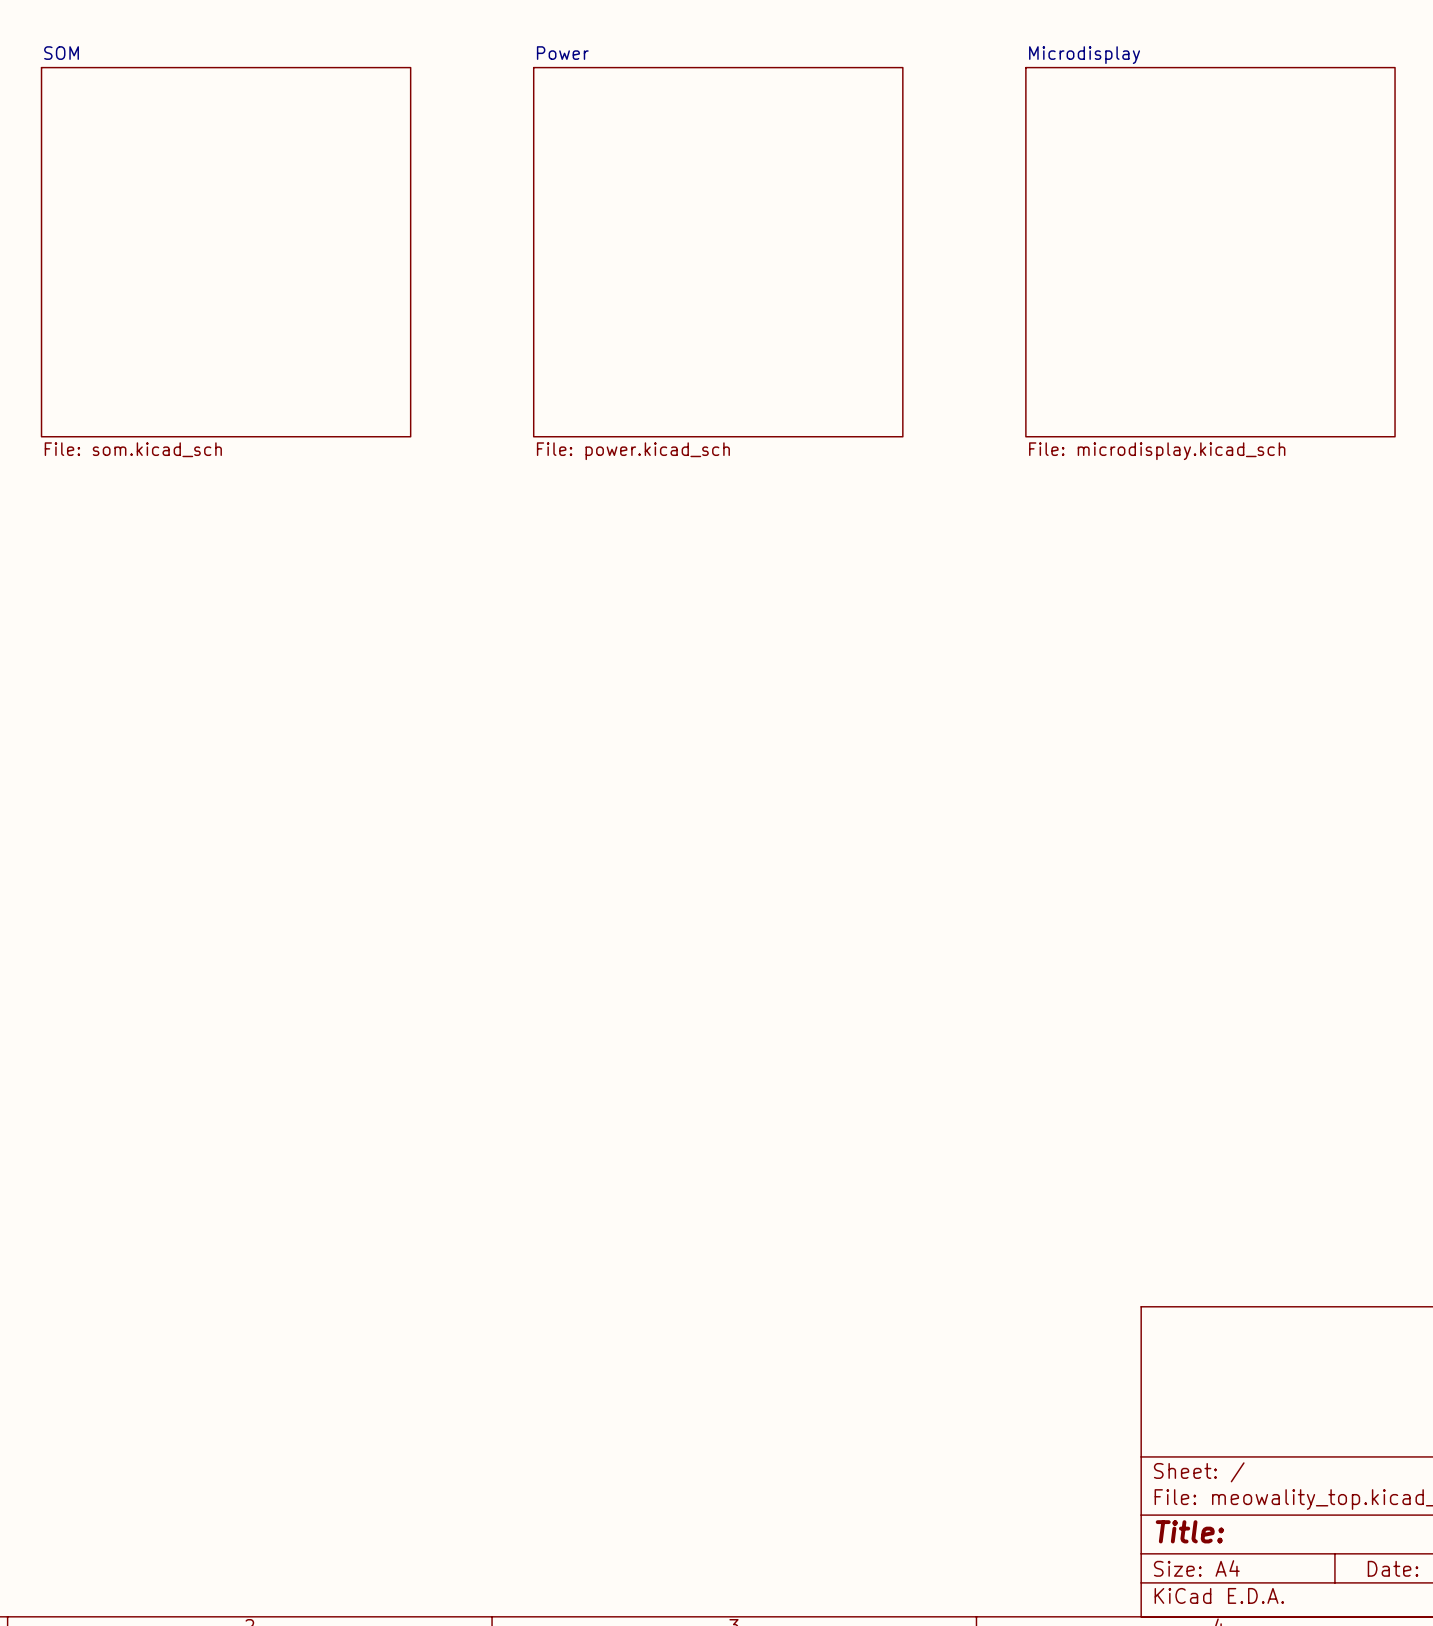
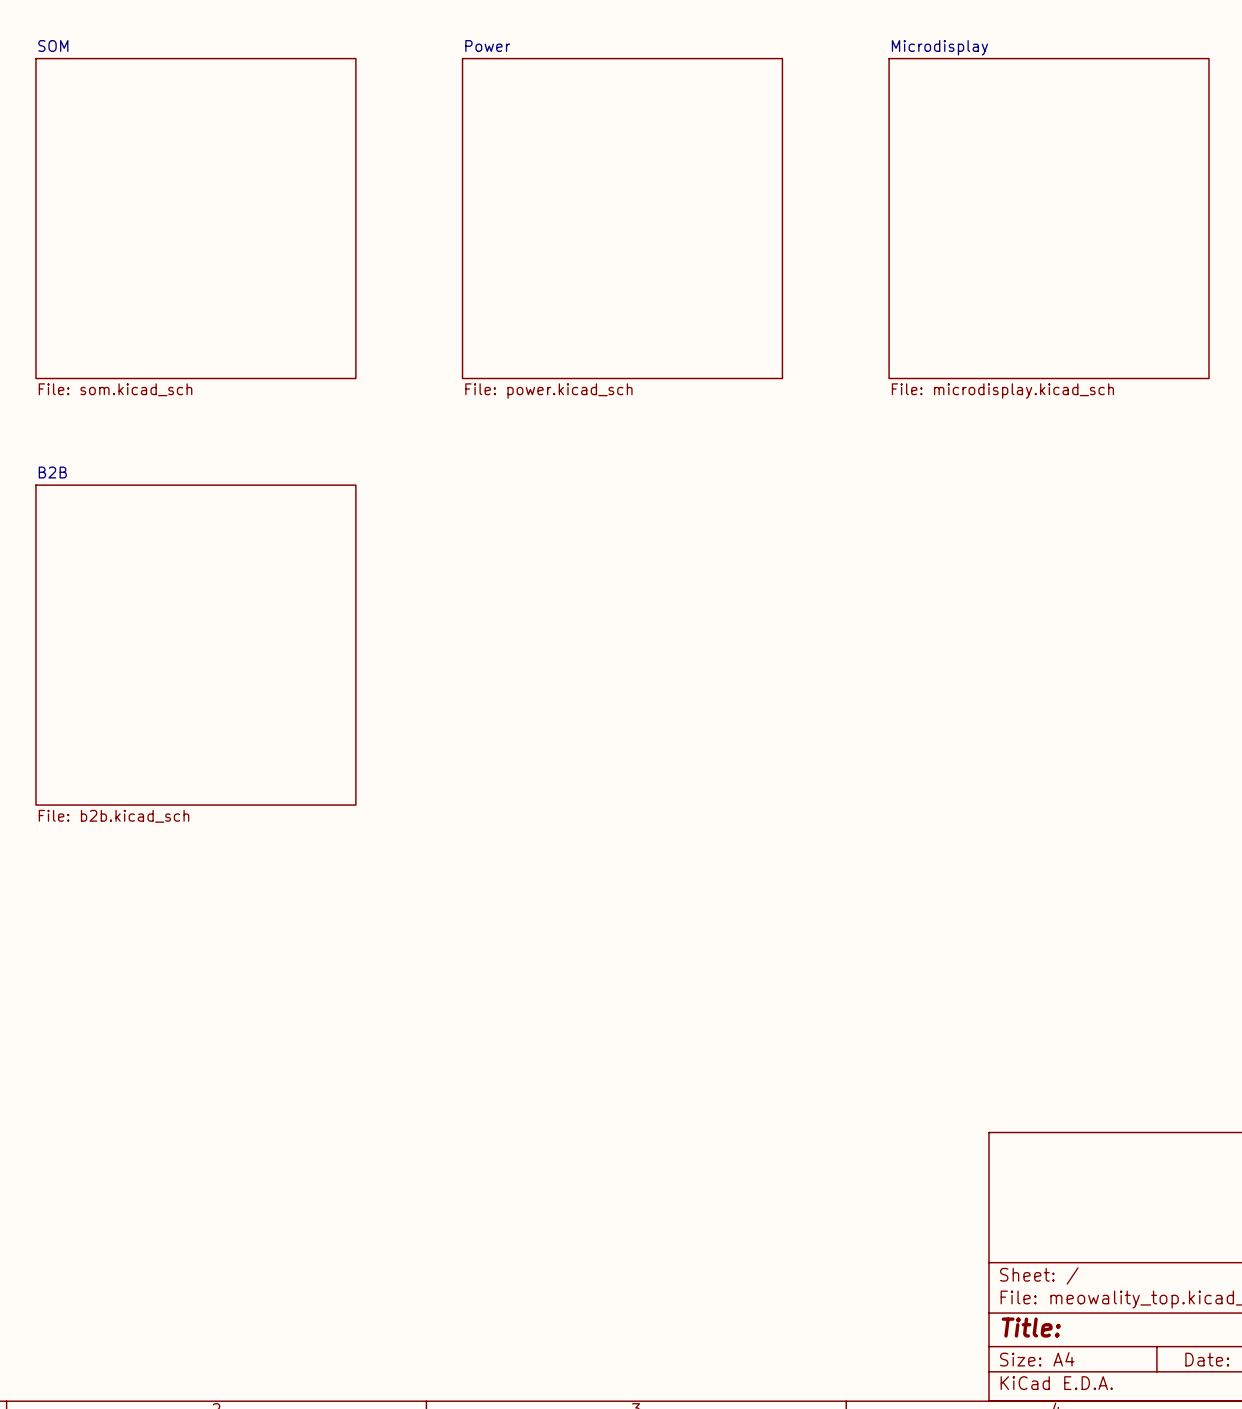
sheet B2B: none -> File: b2b.kicad_sch (195, 645)

